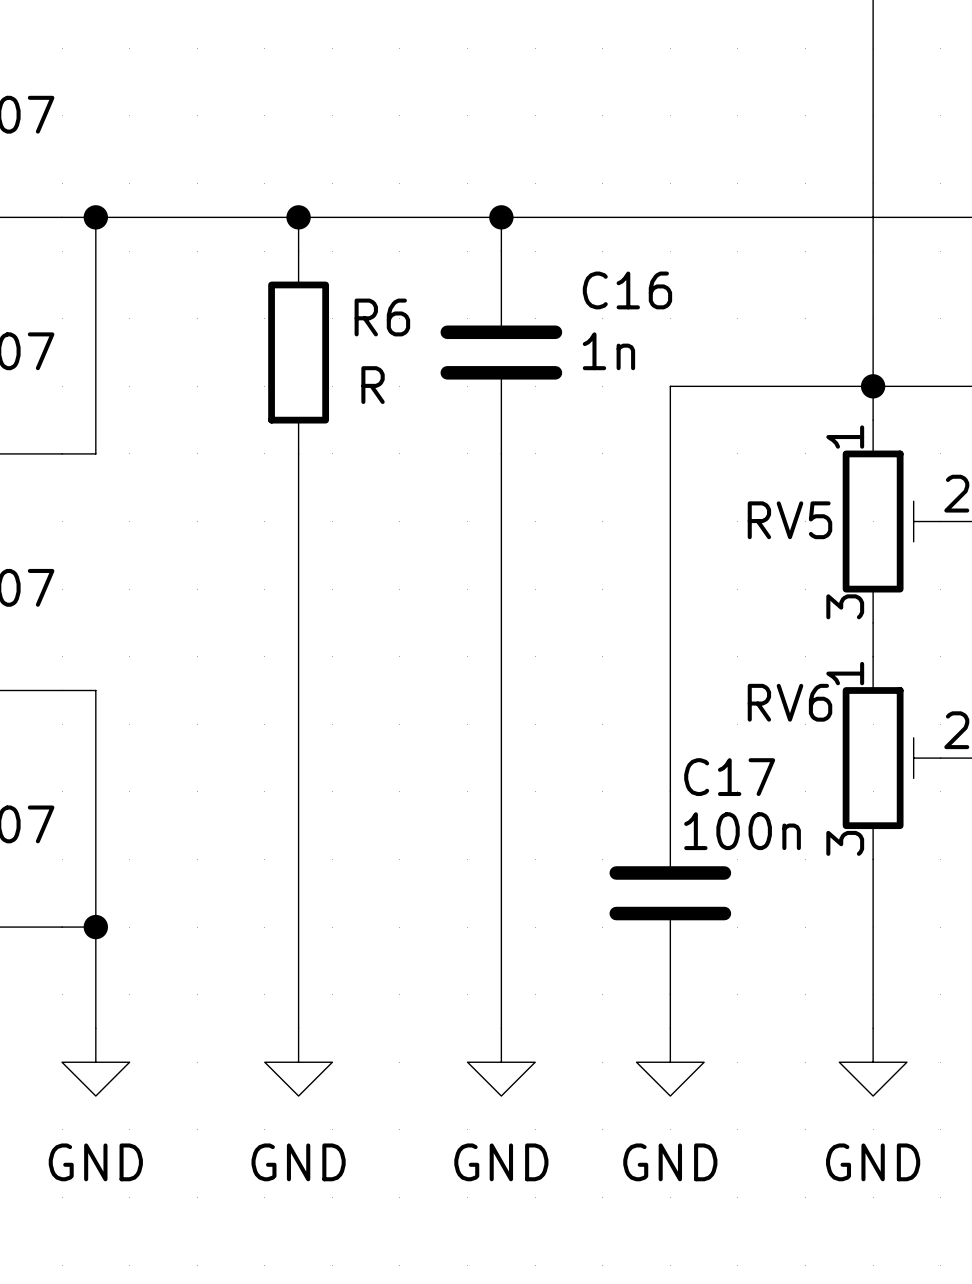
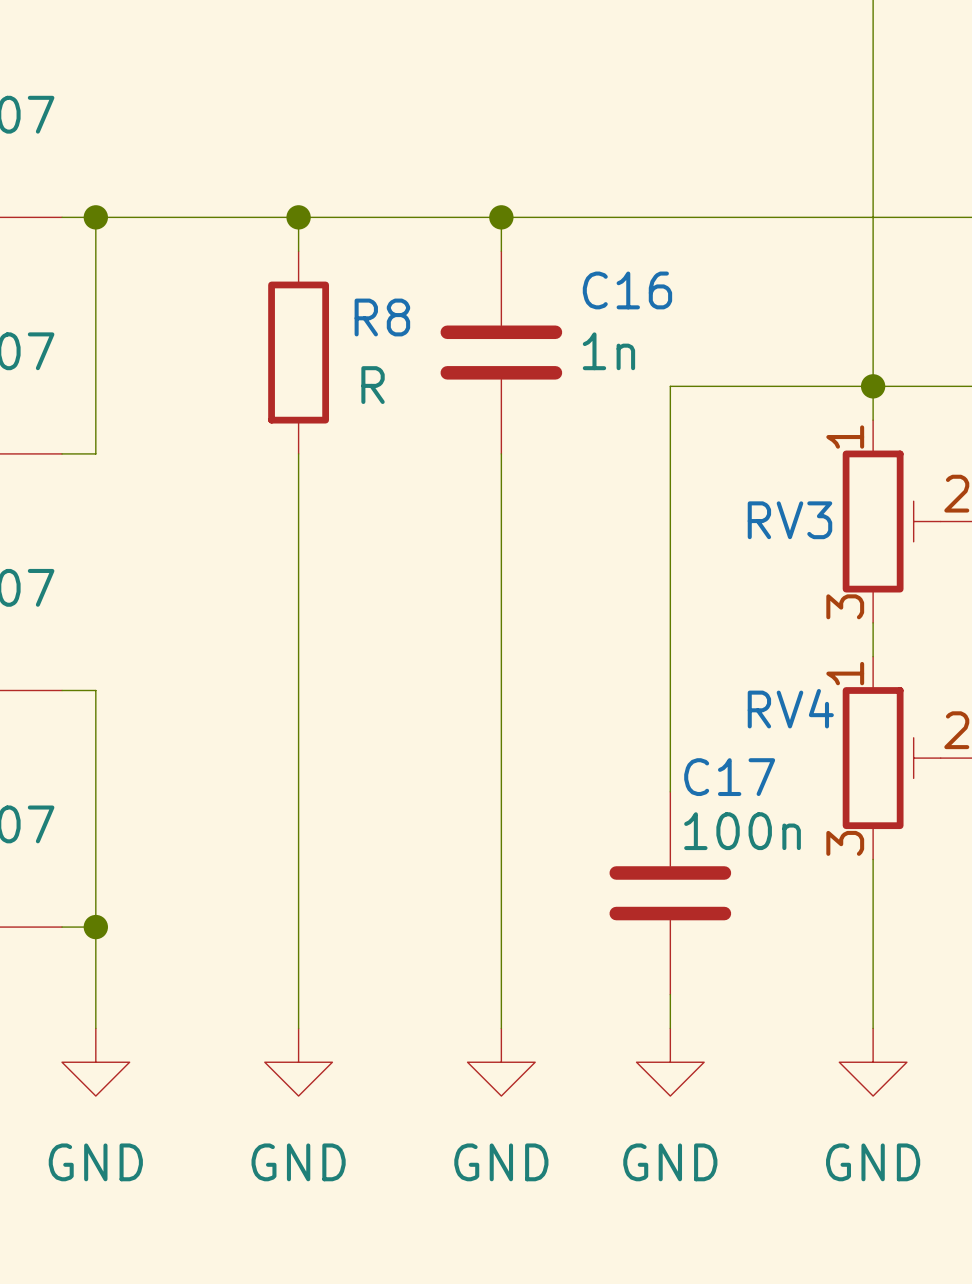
R6 name: R6 (382, 317) -> R8 (382, 317)
RV5 name: RV5 (789, 520) -> RV3 (789, 520)
RV6 name: RV6 (789, 702) -> RV4 (790, 708)

